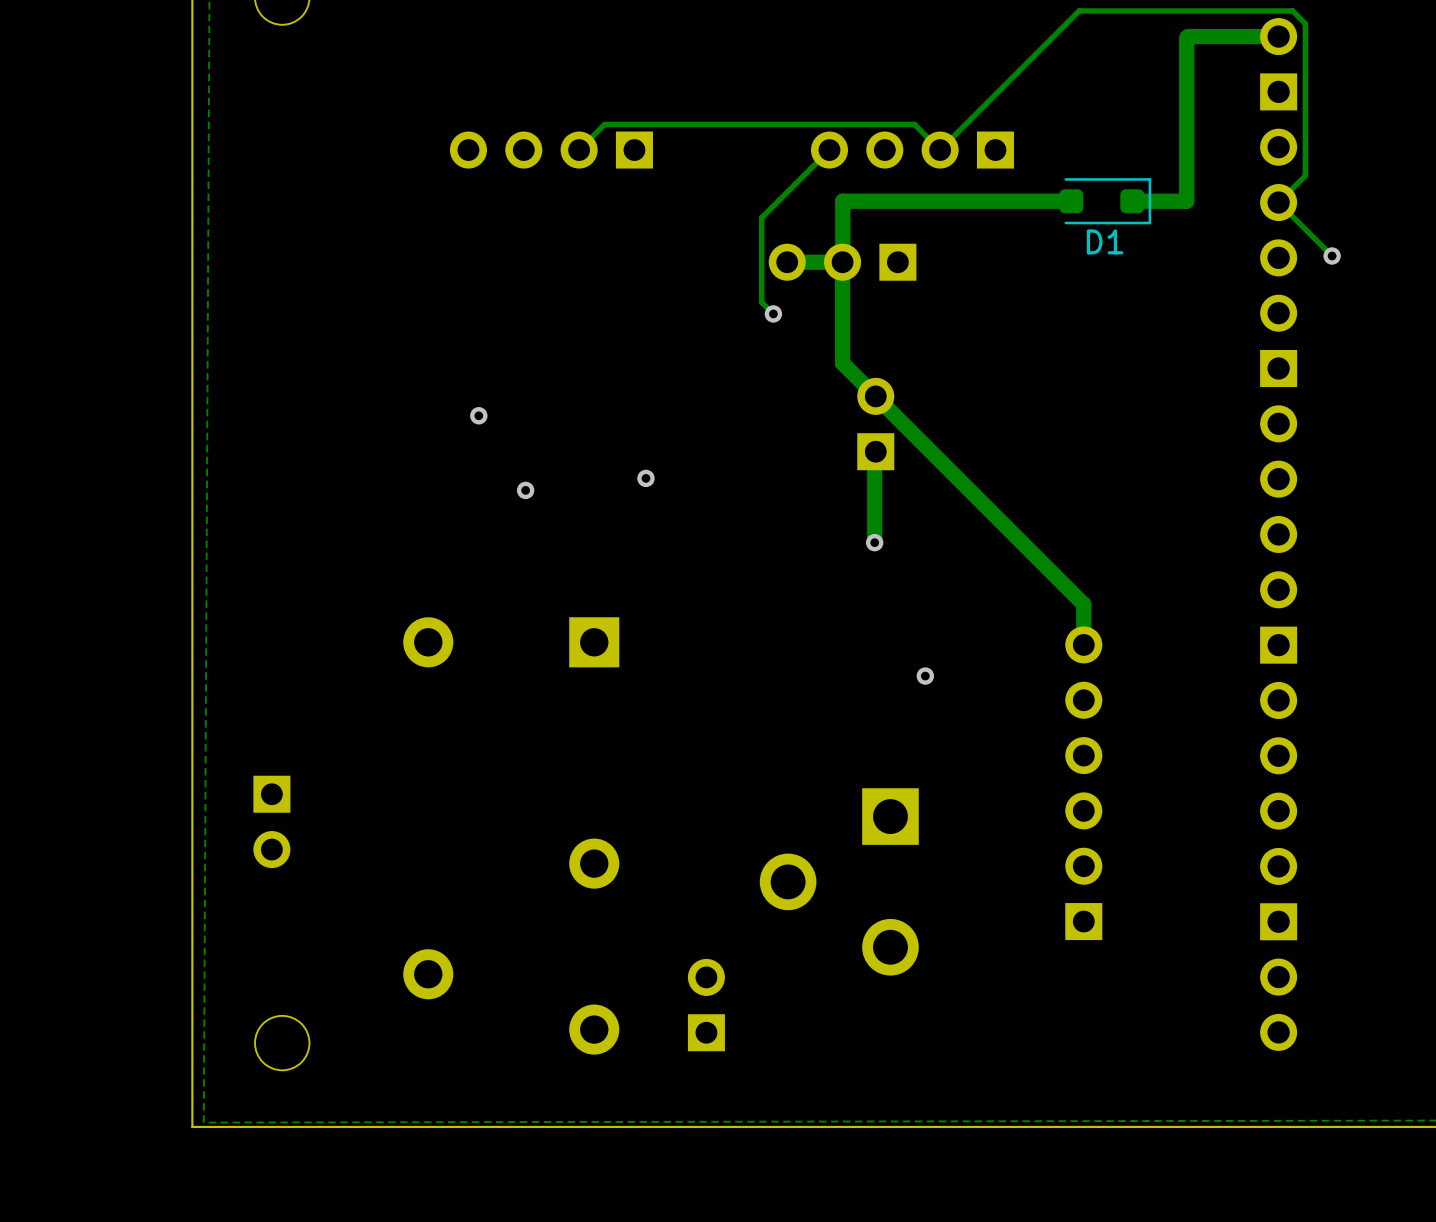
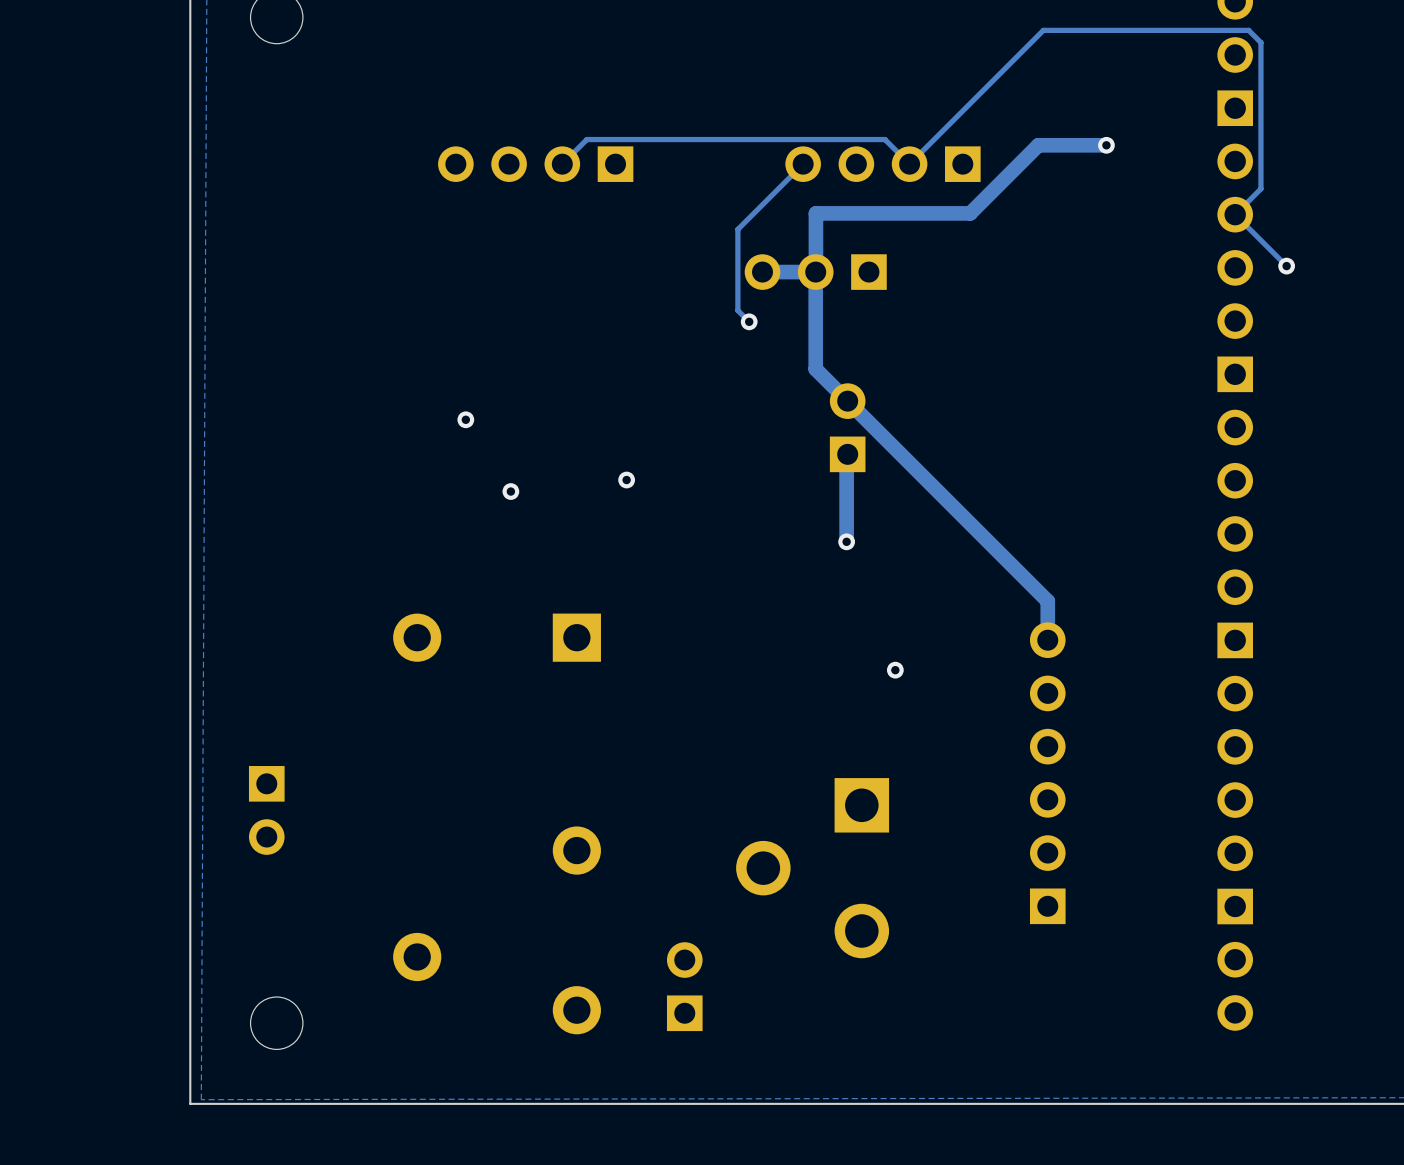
track: (1278, 36) (1186, 37) (1186, 201) (1132, 201) -> none
via: none -> (1106, 145)
track: (1071, 201) (1003, 201) -> (1106, 145) (1038, 145) (970, 213)
D1: (1105, 201) -> none

